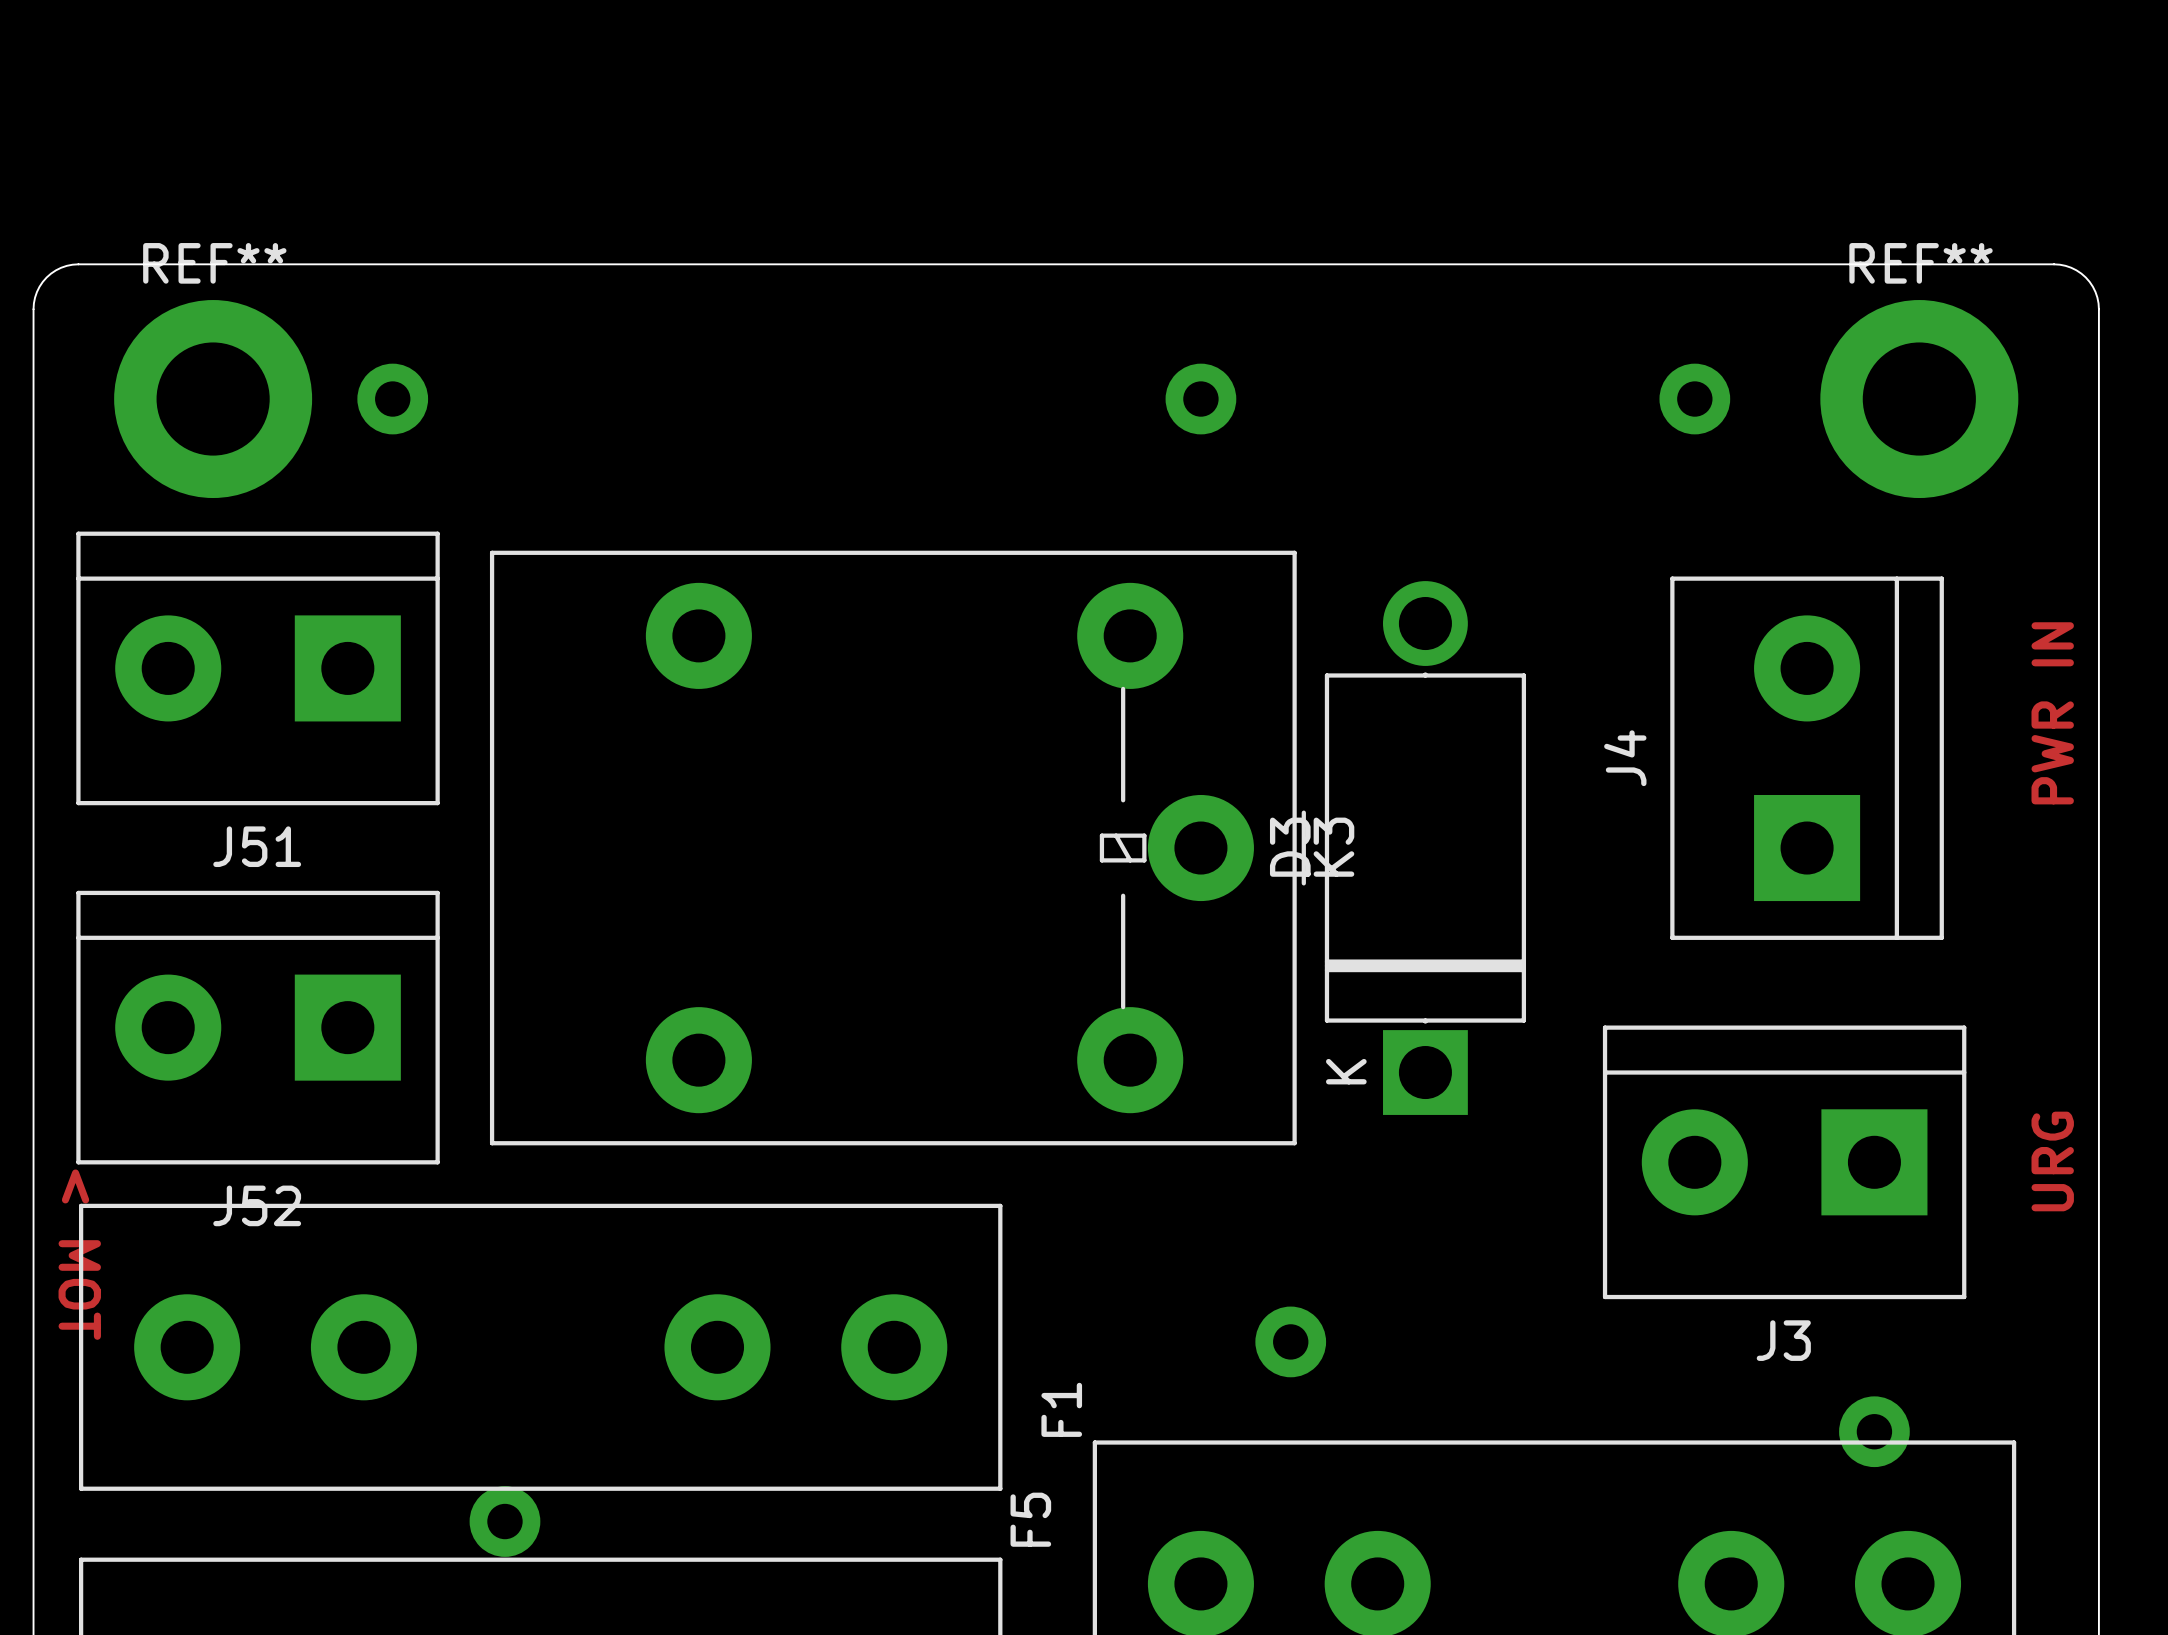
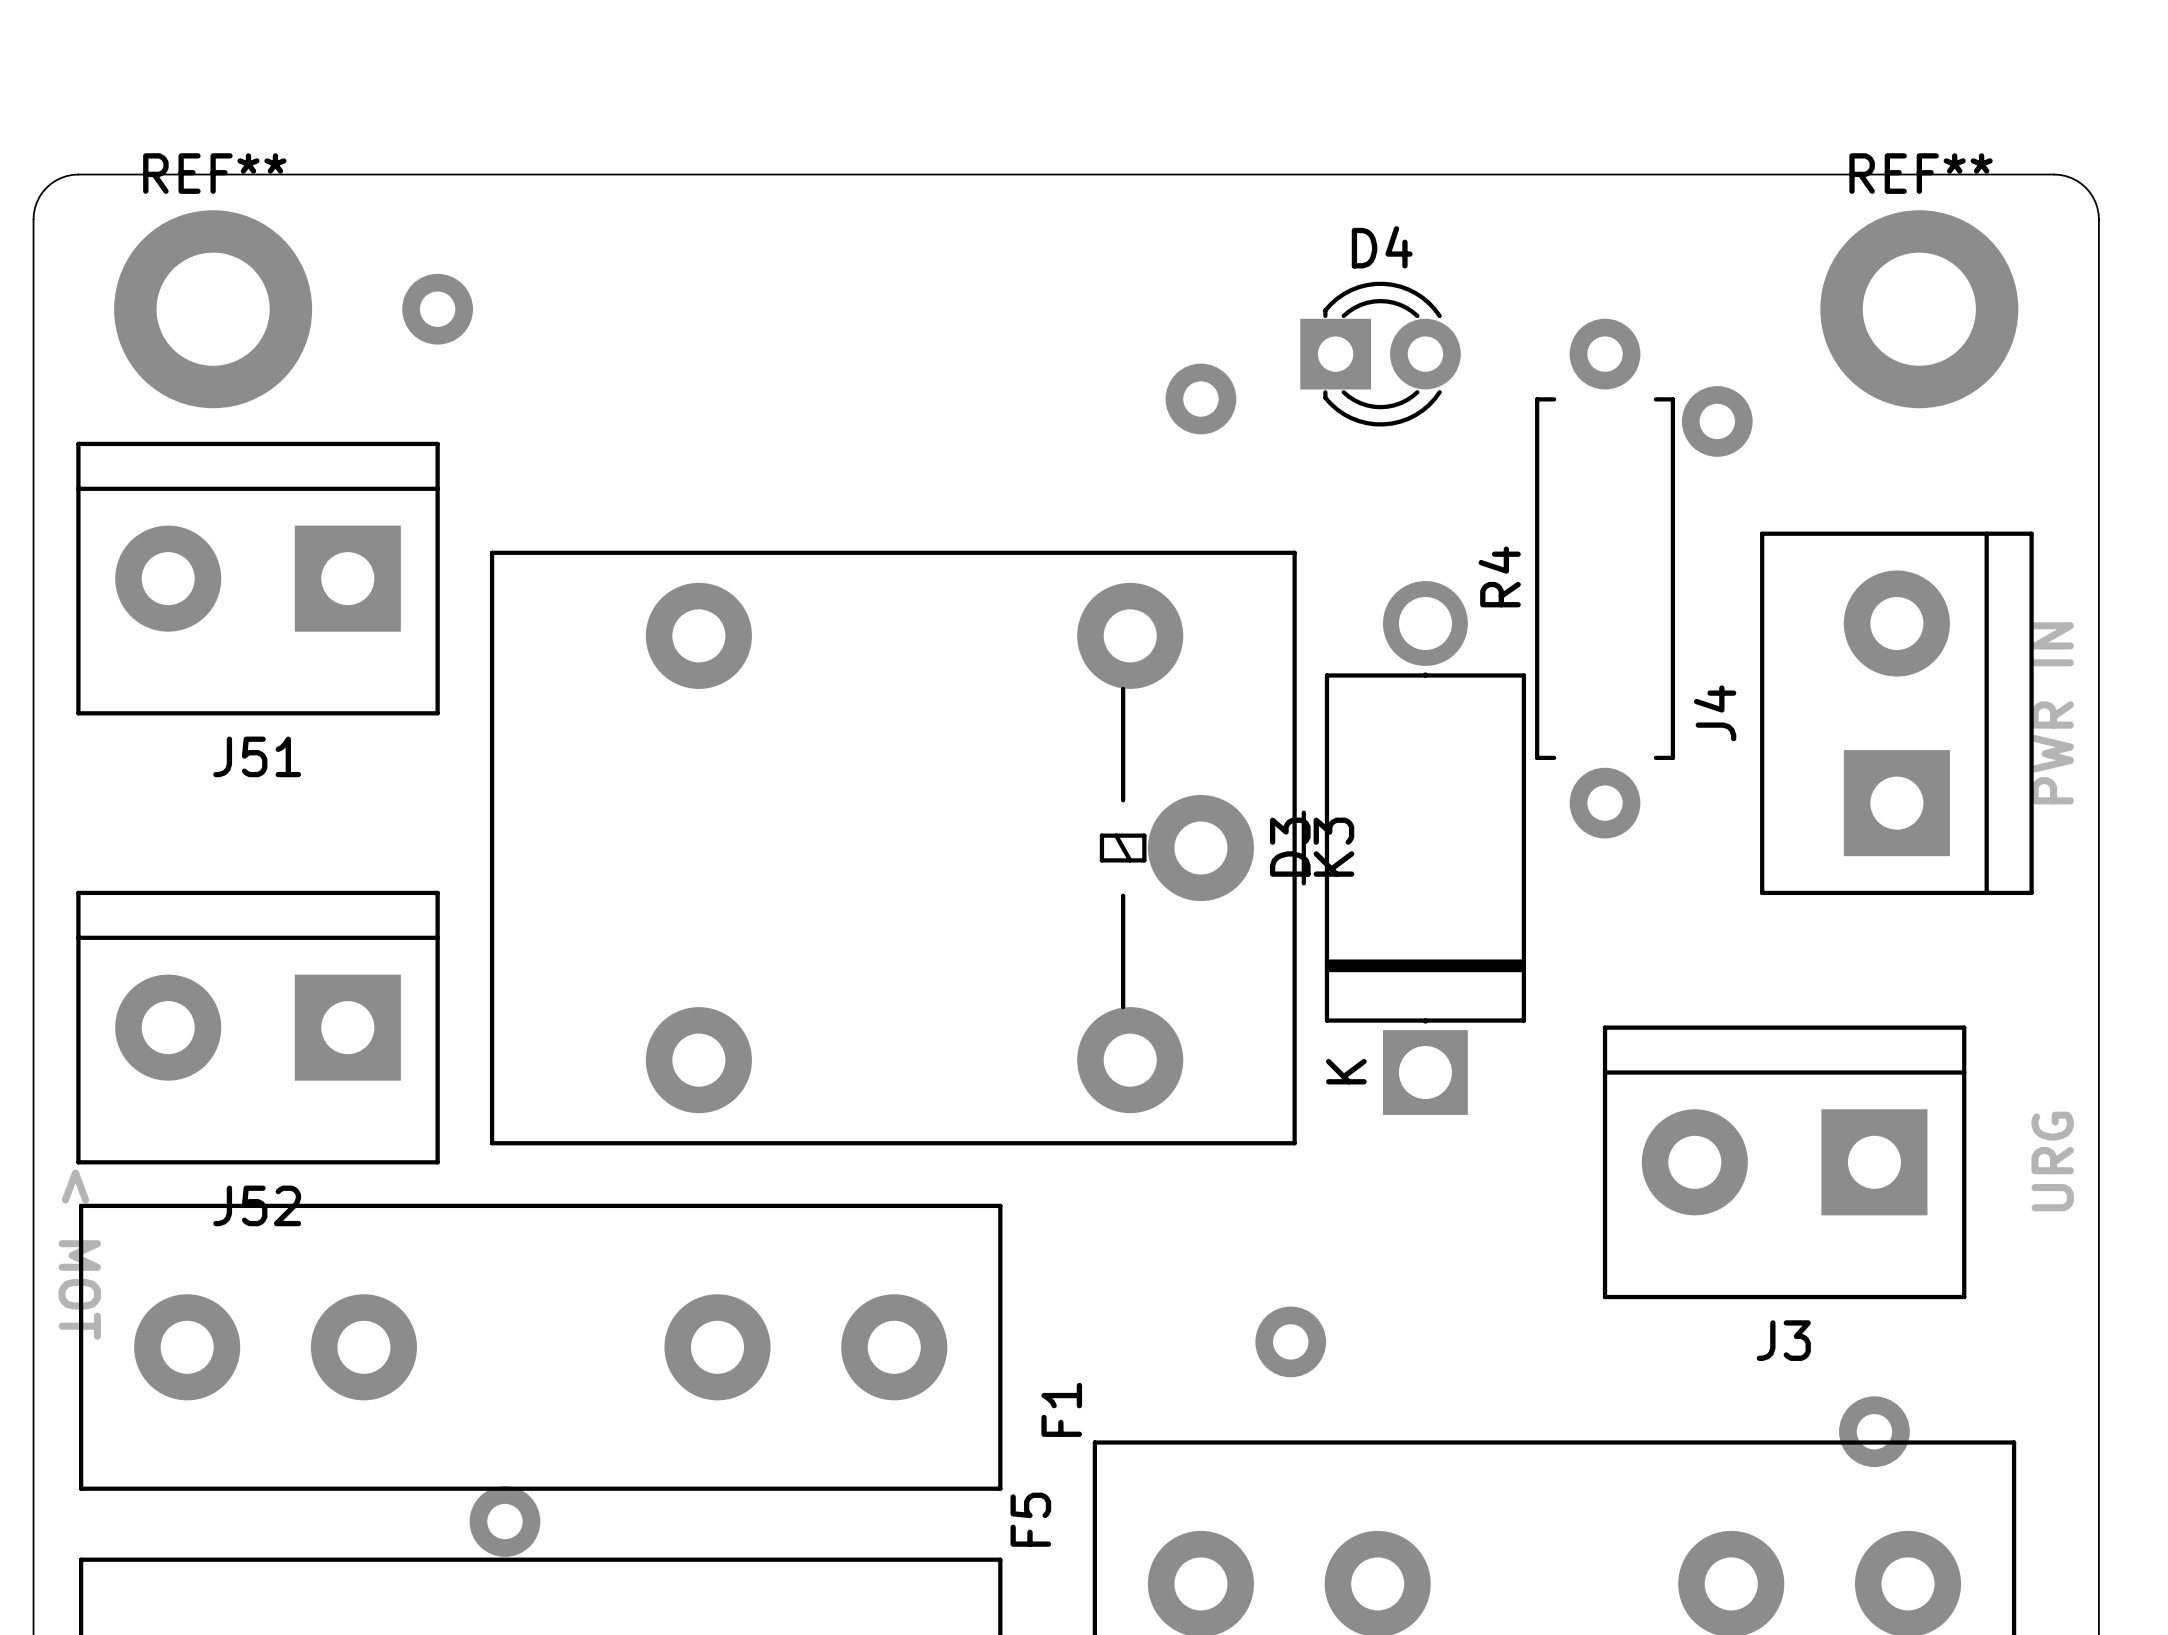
board edge: (33, 309) (36, 292) (46, 277) (61, 267) (78, 264) (2054, 264) (2071, 267) (2085, 277) (2095, 292) (2098, 309) -> (33, 309) (35, 207) (42, 192) (51, 183) (66, 176) (78, 174) (2059, 174) (2071, 177) (2081, 183) (2089, 192) (2097, 207) (2098, 309)
D4: none -> (1380, 354)
REF** position: (213, 399) -> (213, 309)
via position: (392, 399) -> (437, 309)
via position: (1694, 399) -> (1717, 421)
REF** position: (1919, 399) -> (1919, 309)
R4: none -> (1605, 578)
J51 position: (258, 668) -> (258, 578)
J4 position: (1807, 758) -> (1896, 713)

